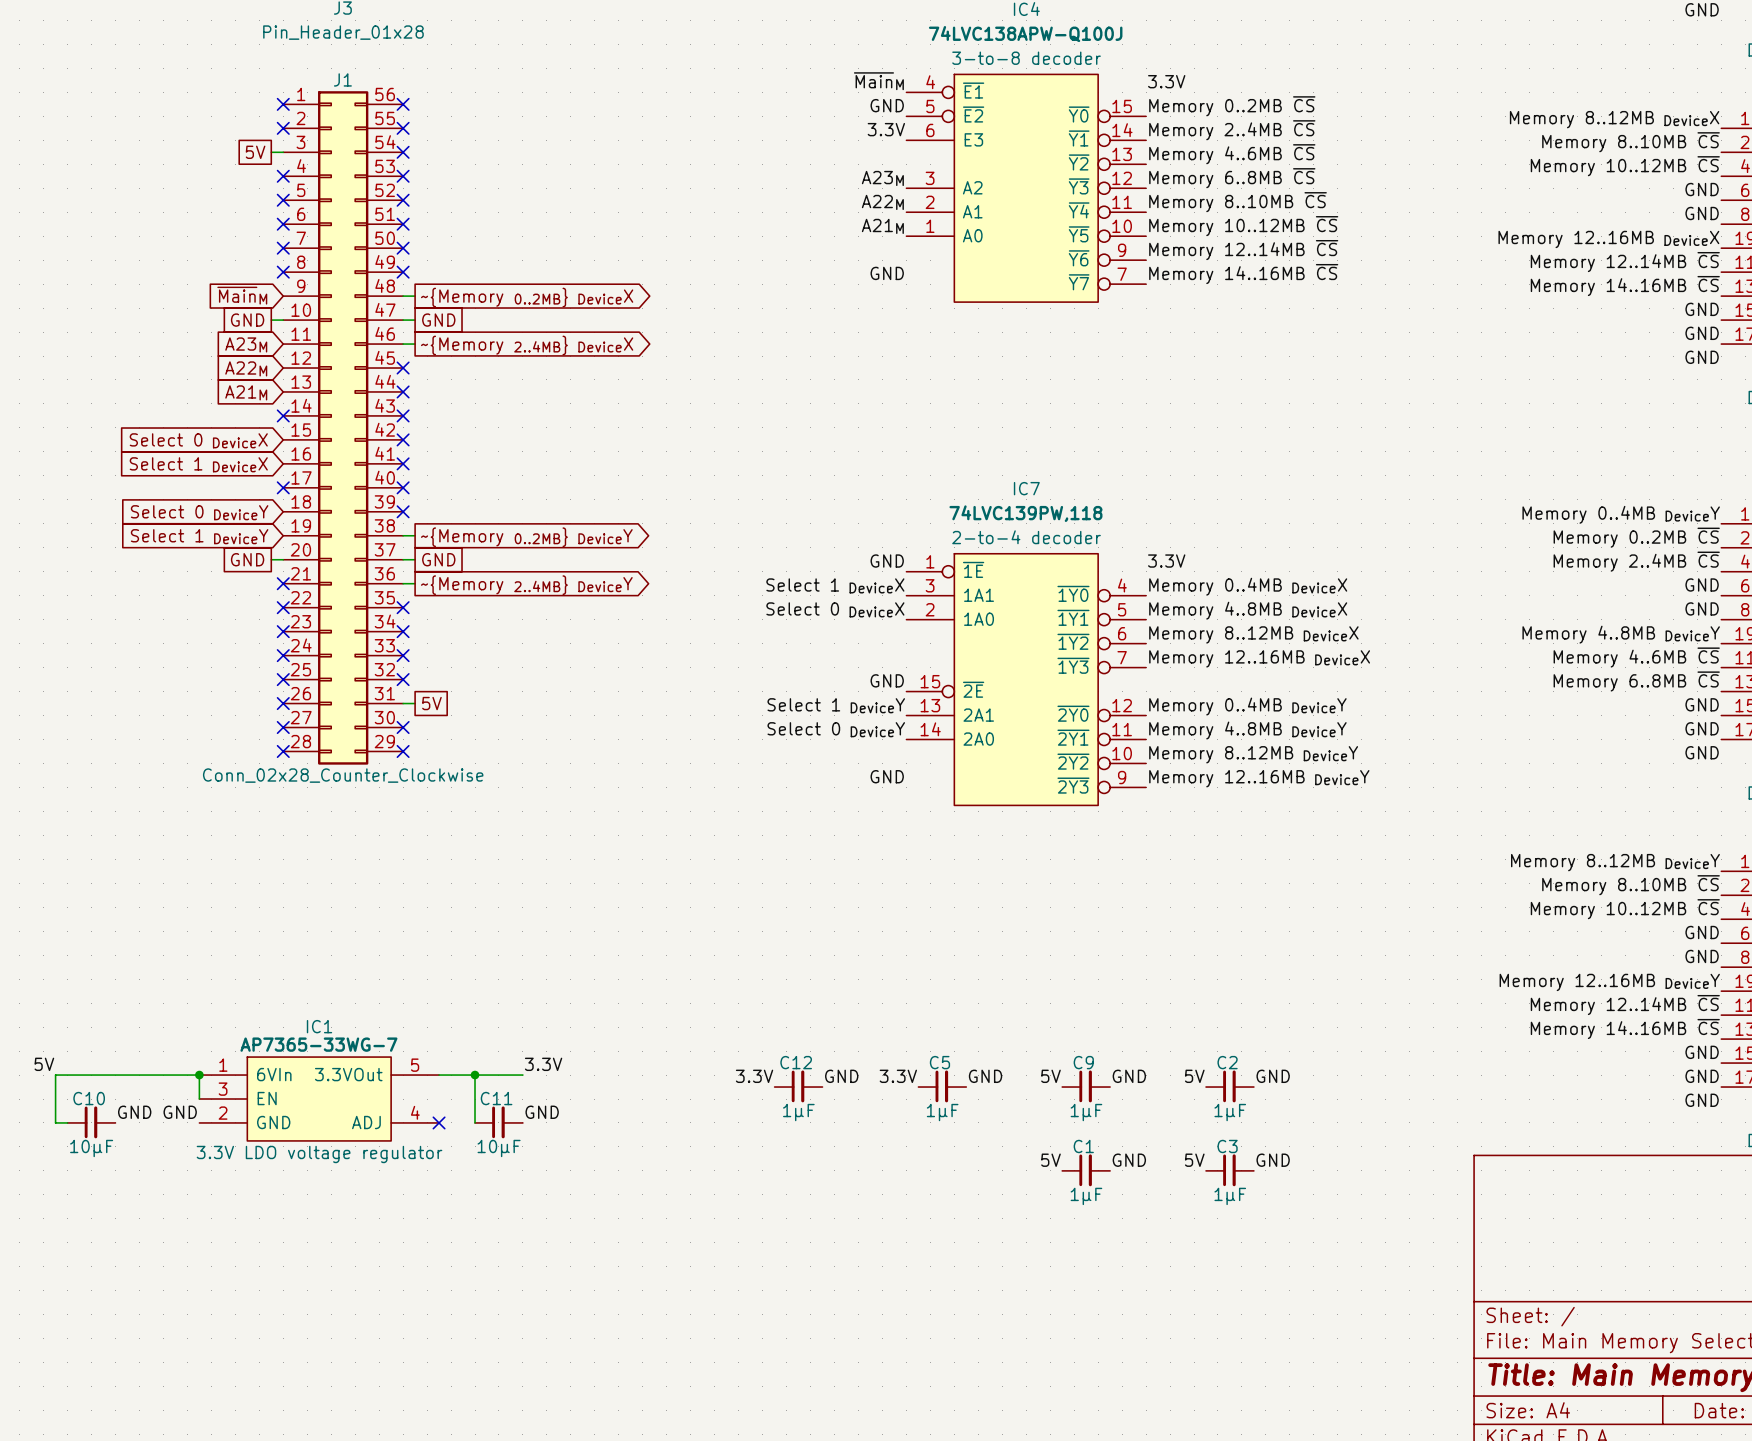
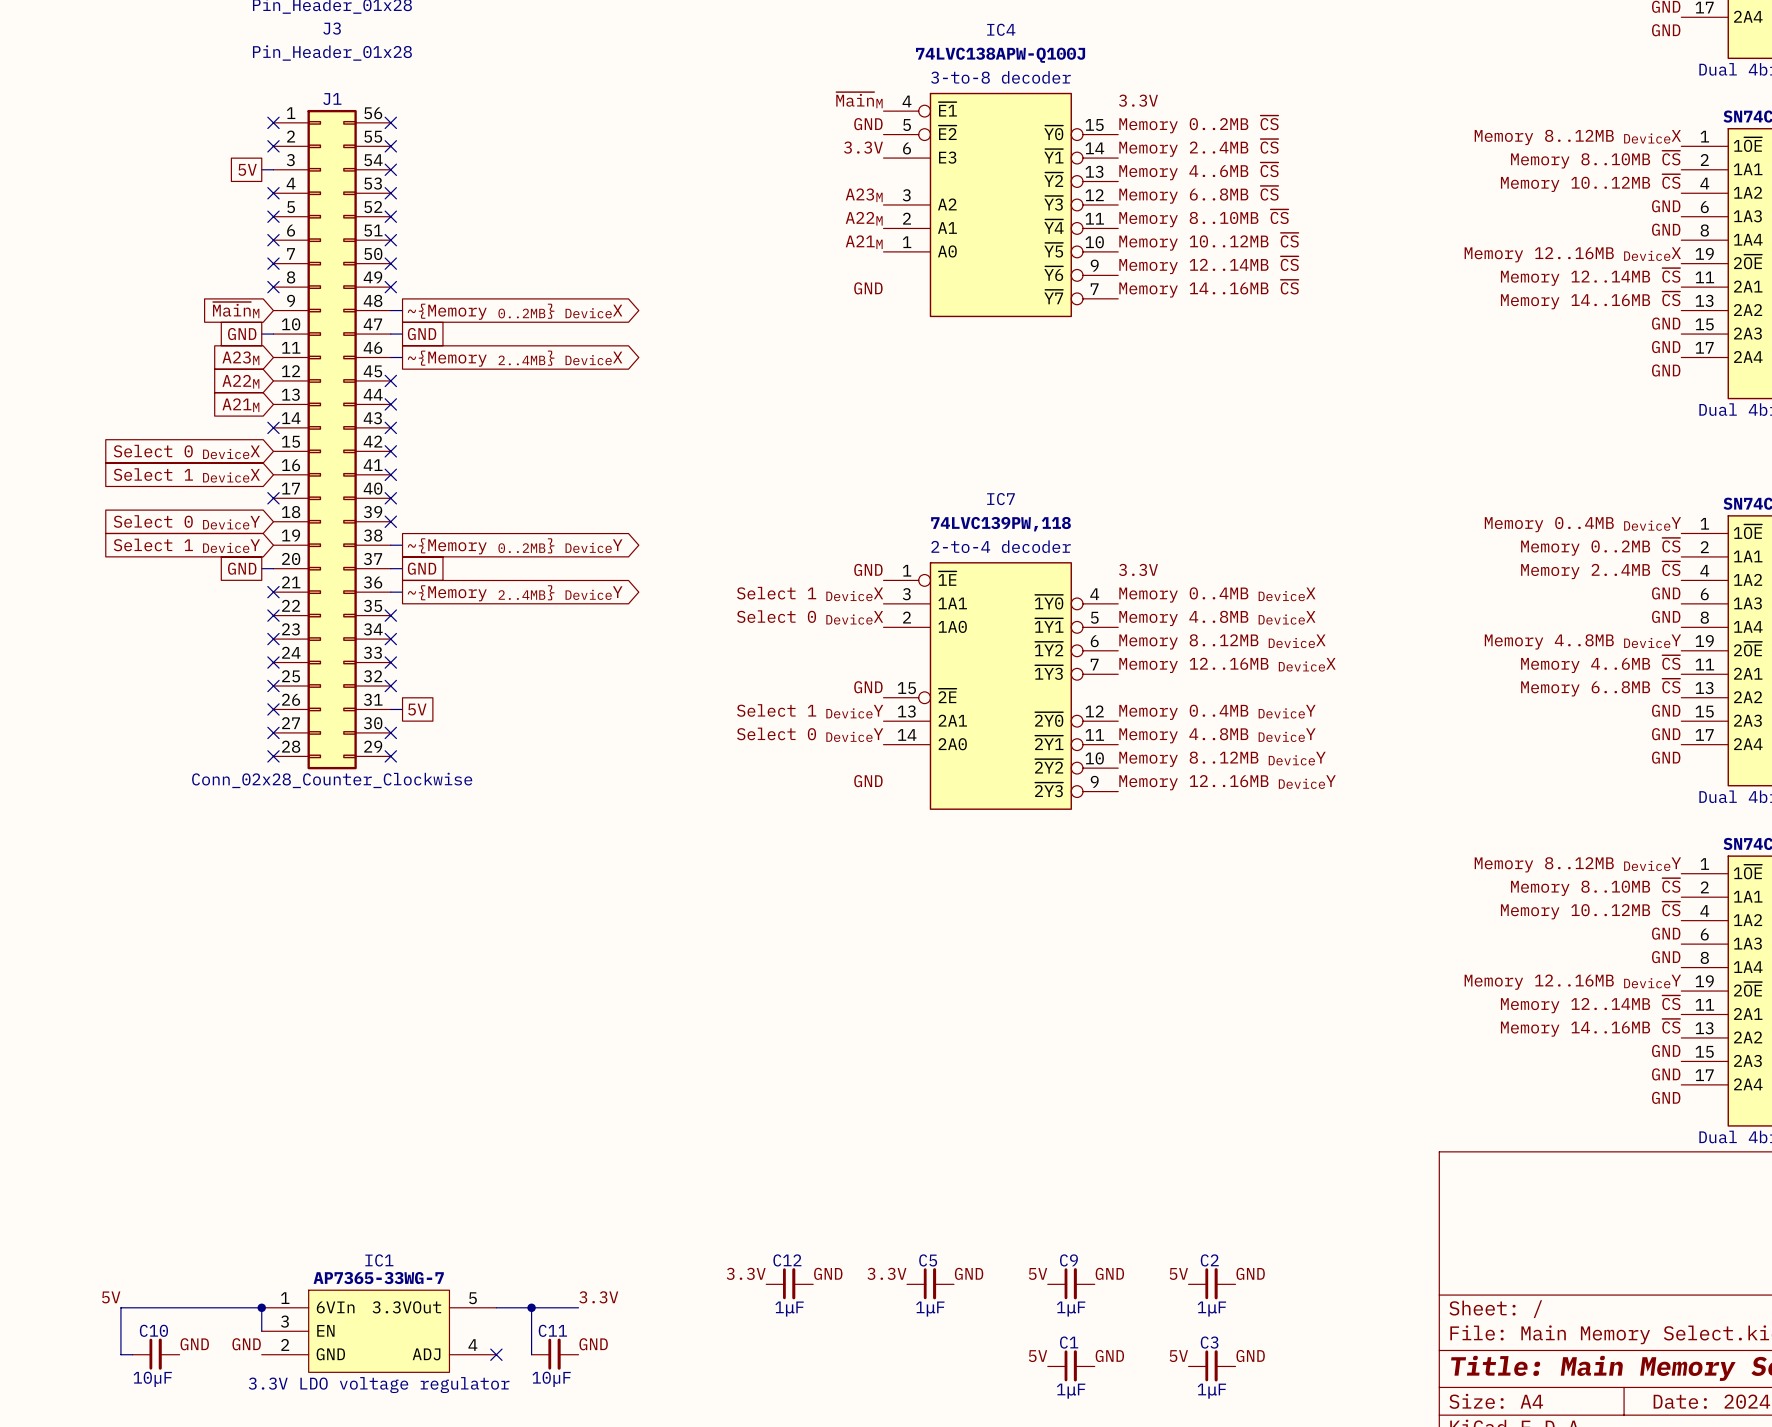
label: 5V (44, 1064) -> none
label: 3.3V (543, 1064) -> none
junction: (199, 1075) -> none
wire: (439, 1075) (522, 1075) -> none
wire: (475, 1075) (475, 1122) -> none
junction: (475, 1075) -> none
label: 3.3V (754, 1076) -> none
label: GND (841, 1076) -> none
label: 3.3V (898, 1076) -> none
label: GND (985, 1076) -> none
label: 5V (1050, 1076) -> none
label: GND (1129, 1076) -> none
label: 5V (1194, 1076) -> none
label: GND (1273, 1076) -> none
C12 position: (798, 1086) -> (789, 1283)
C5 position: (942, 1086) -> (930, 1283)
C9 position: (1086, 1086) -> (1071, 1283)
C2 position: (1229, 1086) -> (1212, 1283)
wire: (199, 1099) (199, 1075) (55, 1075) (55, 1122) (67, 1122) -> none
IC1 position: (319, 1099) -> (379, 1331)
label: GND (134, 1112) -> none
label: GND (180, 1112) -> none
label: GND (542, 1112) -> none
C10 position: (91, 1122) -> (156, 1354)
no-connect mark: (439, 1122) -> none
C11 position: (498, 1122) -> (555, 1354)
label: 5V (1050, 1160) -> none
label: GND (1129, 1160) -> none
label: 5V (1194, 1160) -> none
label: GND (1273, 1160) -> none
C1 position: (1086, 1170) -> (1071, 1365)
C3 position: (1229, 1170) -> (1212, 1365)
label: none -> 3.3V (746, 1273)
label: none -> GND (828, 1273)
label: none -> 3.3V (886, 1273)
label: none -> GND (969, 1273)
label: none -> 5V (1038, 1273)
label: none -> GND (1109, 1273)
label: none -> 5V (1178, 1273)
label: none -> GND (1250, 1273)
label: none -> 5V (111, 1297)
label: none -> 3.3V (598, 1297)
junction: none -> (261, 1307)
wire: none -> (496, 1307) (578, 1307)
wire: none -> (531, 1307) (531, 1354)
junction: none -> (531, 1307)
wire: none -> (261, 1331) (261, 1307) (120, 1307) (120, 1354) (132, 1354)
label: none -> GND (194, 1344)
label: none -> GND (246, 1344)
label: none -> GND (593, 1344)
no-connect mark: none -> (496, 1354)
label: none -> 5V (1038, 1356)
label: none -> GND (1109, 1355)
label: none -> 5V (1178, 1356)
label: none -> GND (1250, 1355)

